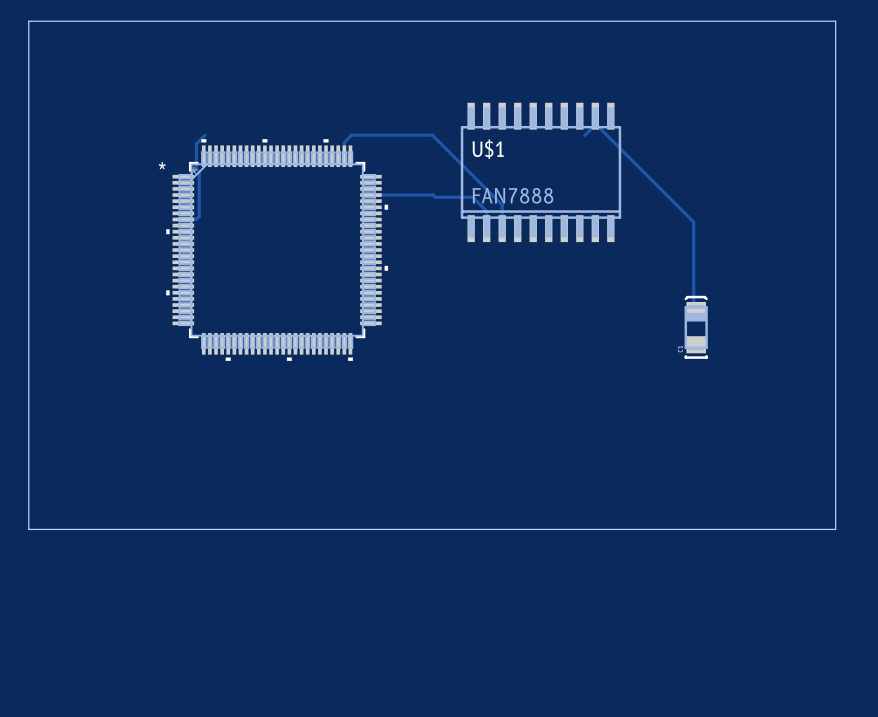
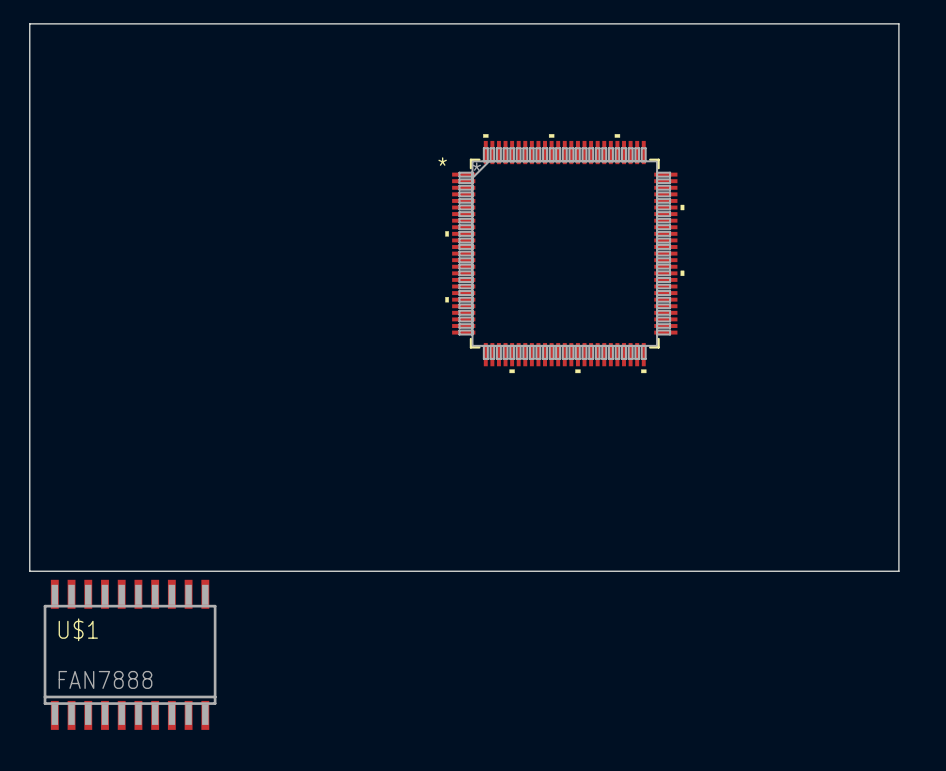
track: (595, 124) (693, 222) (693, 308) (696, 310) -> none
track: (595, 124) (584, 135) -> none
track: (204, 135) (196, 143) (196, 169) (199, 171) (199, 216) (196, 219) (183, 219) -> none
track: (344, 156) (344, 142) (351, 135) (432, 135) (502, 205) (502, 228) -> none
U$1 position: (540, 172) -> (130, 654)
track: (370, 195) (472, 197) (486, 211) (486, 228) -> none
part position: (277, 250) -> (564, 253)
part: (696, 327) -> none

